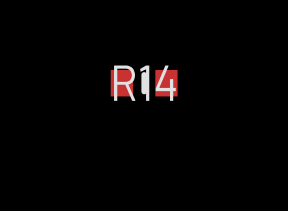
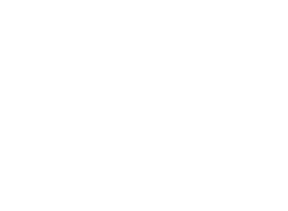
R14: (144, 83) -> none

